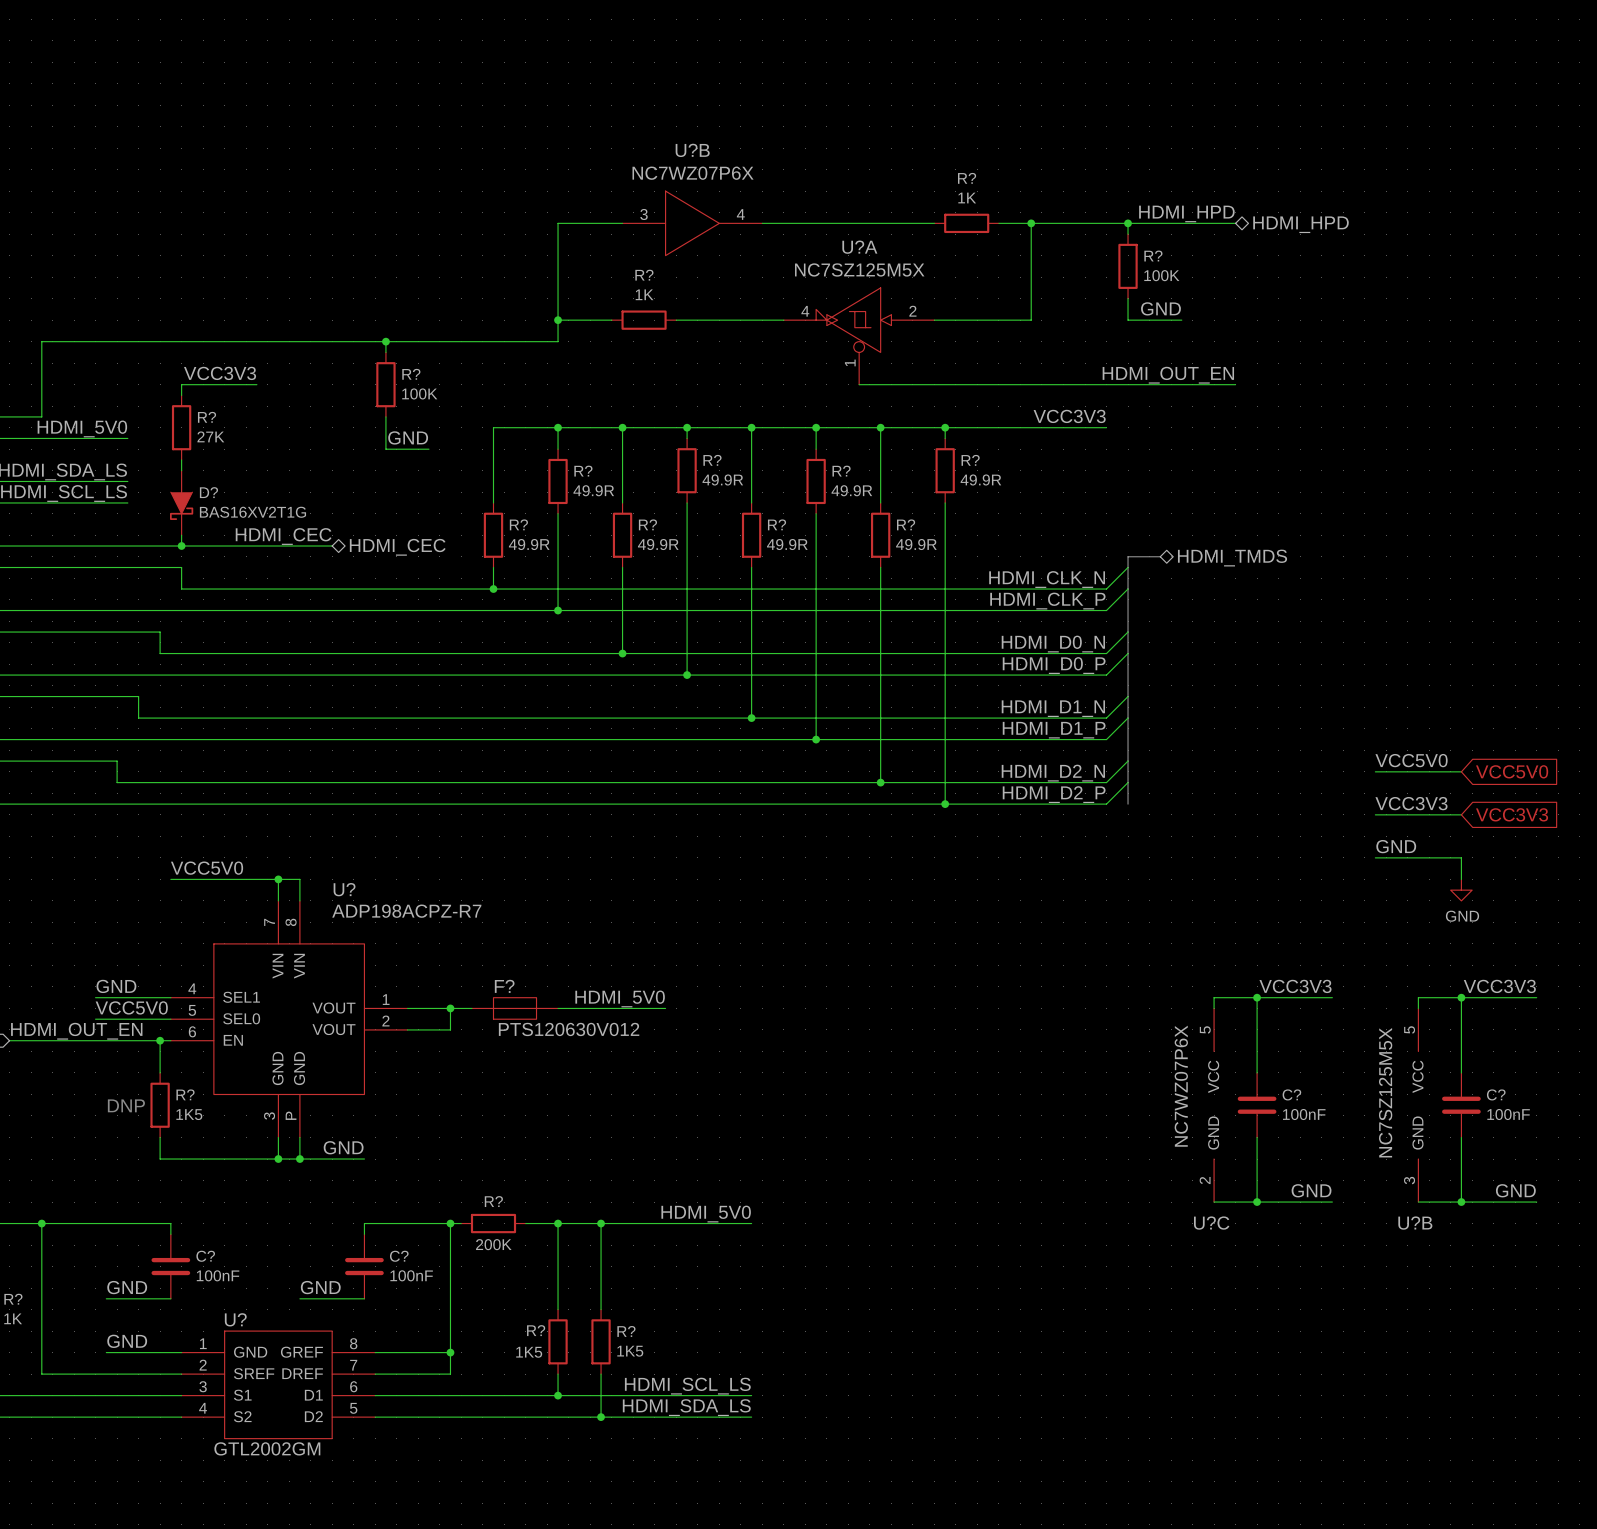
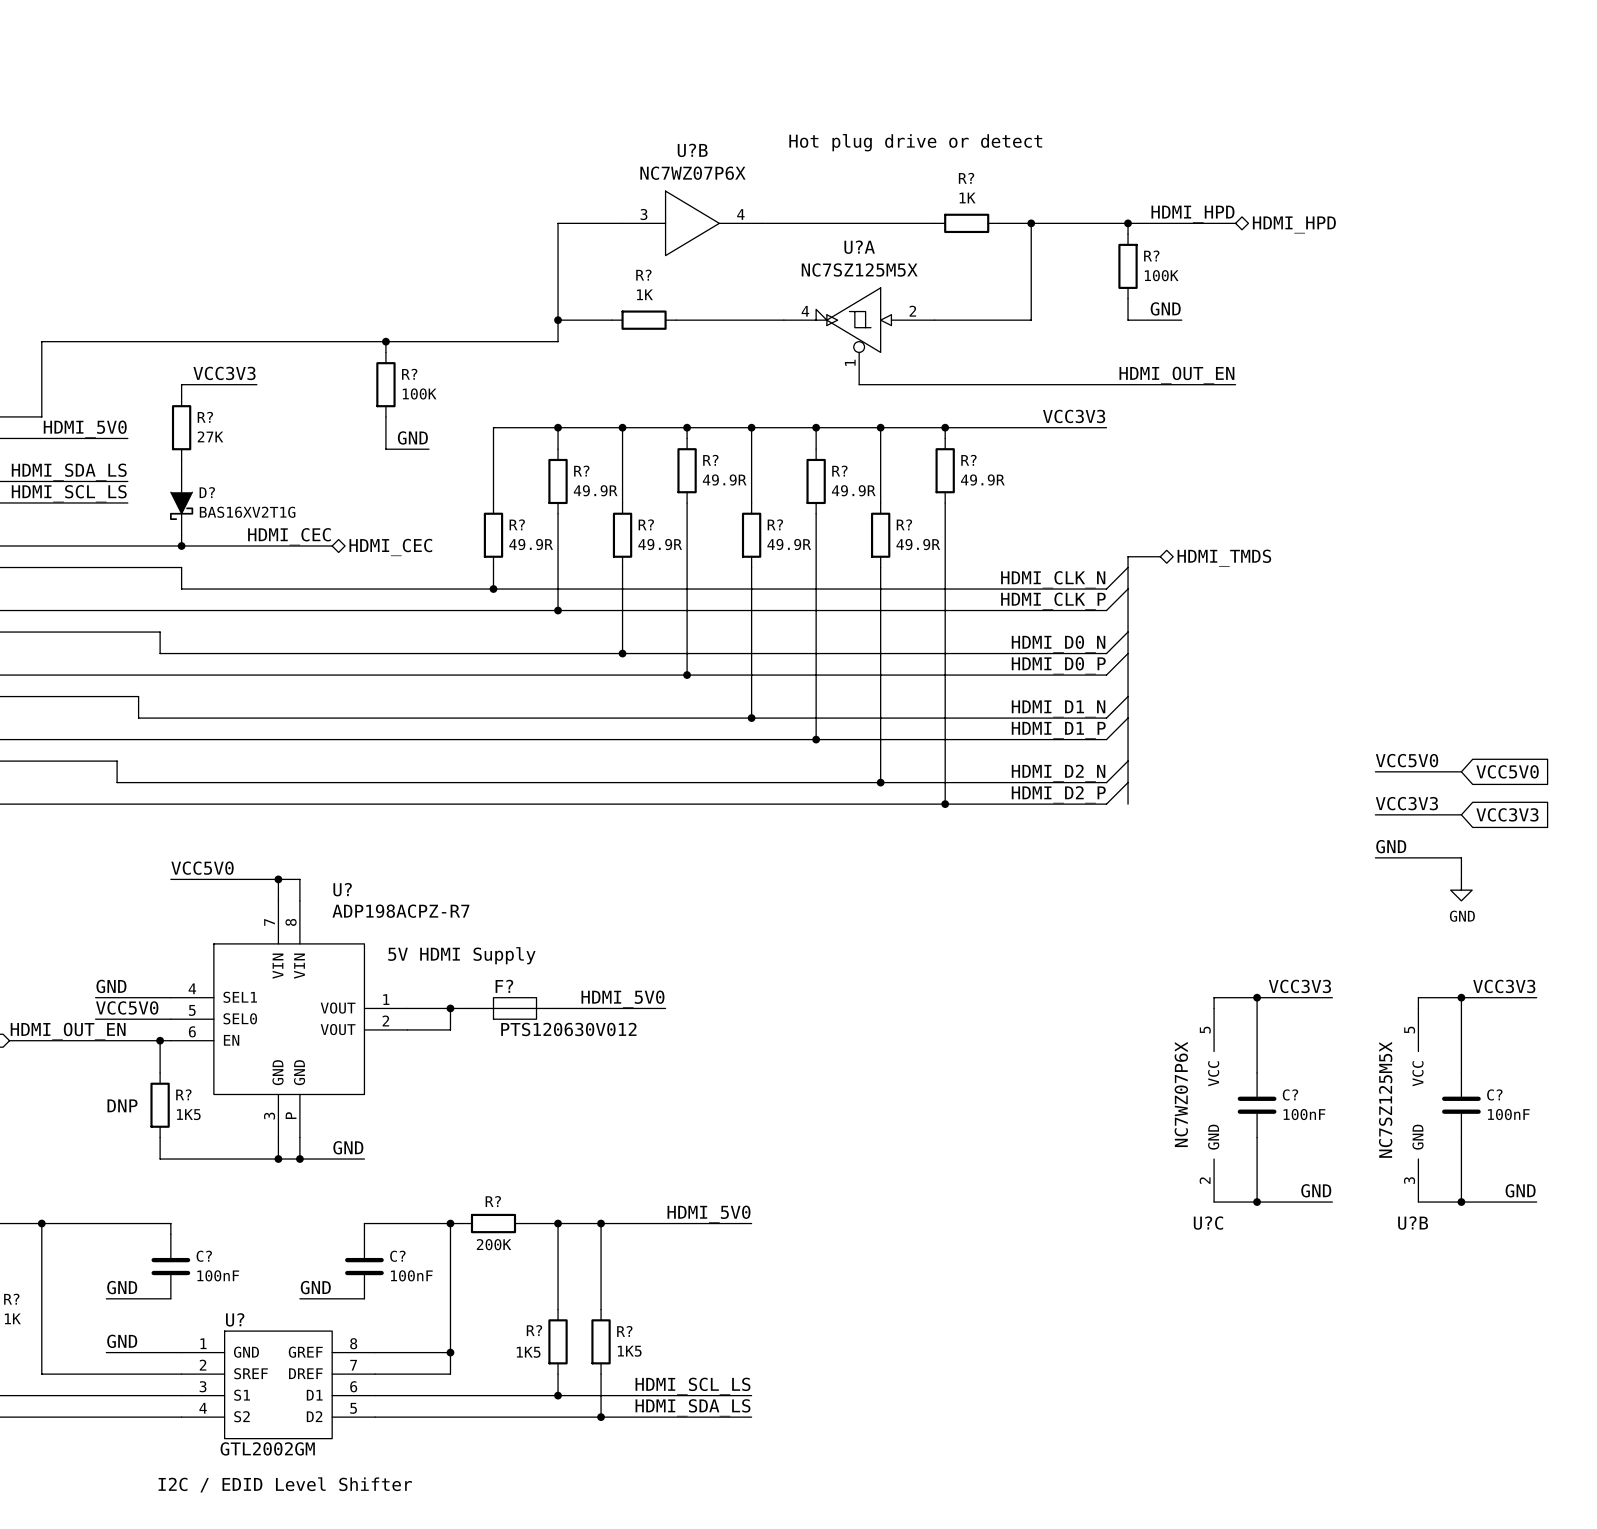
text: none -> Hot plug drive or detect (915, 142)
text: none -> 5V HDMI Supply (461, 955)
text: none -> I2C / EDID Level Shifter (285, 1484)

